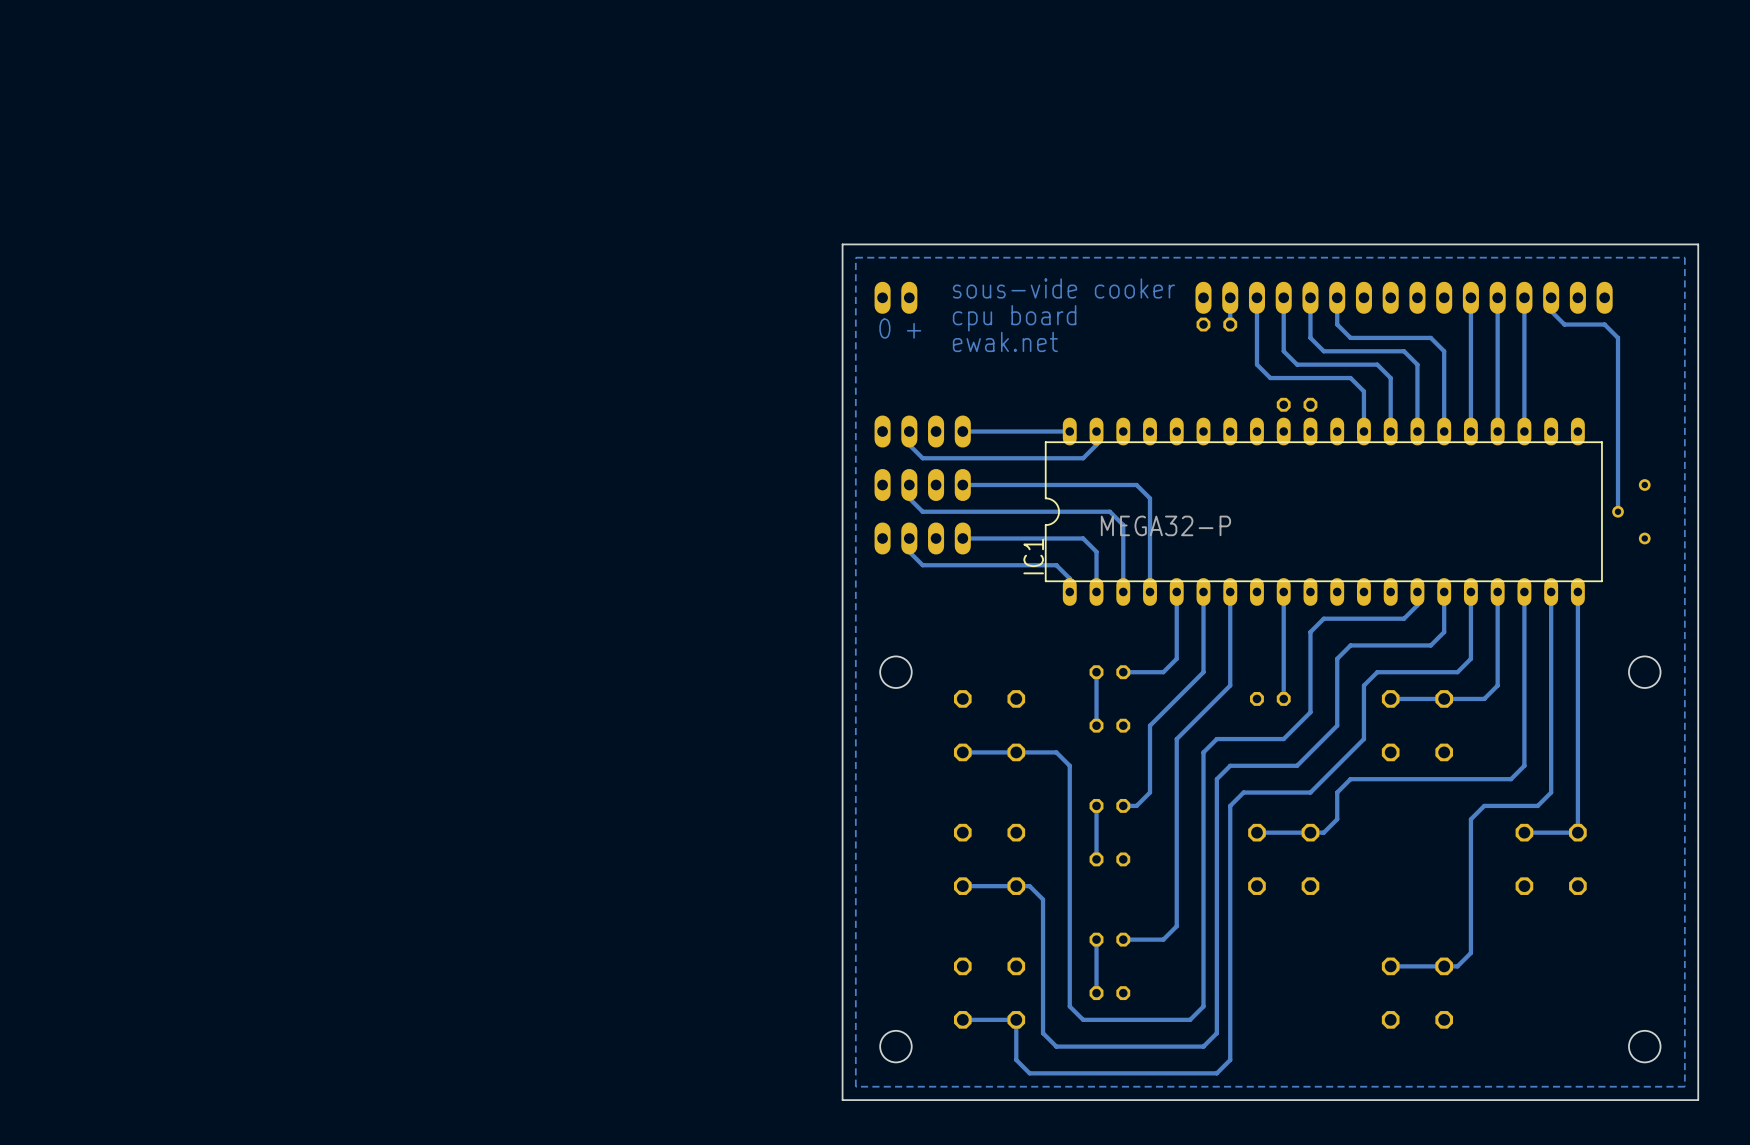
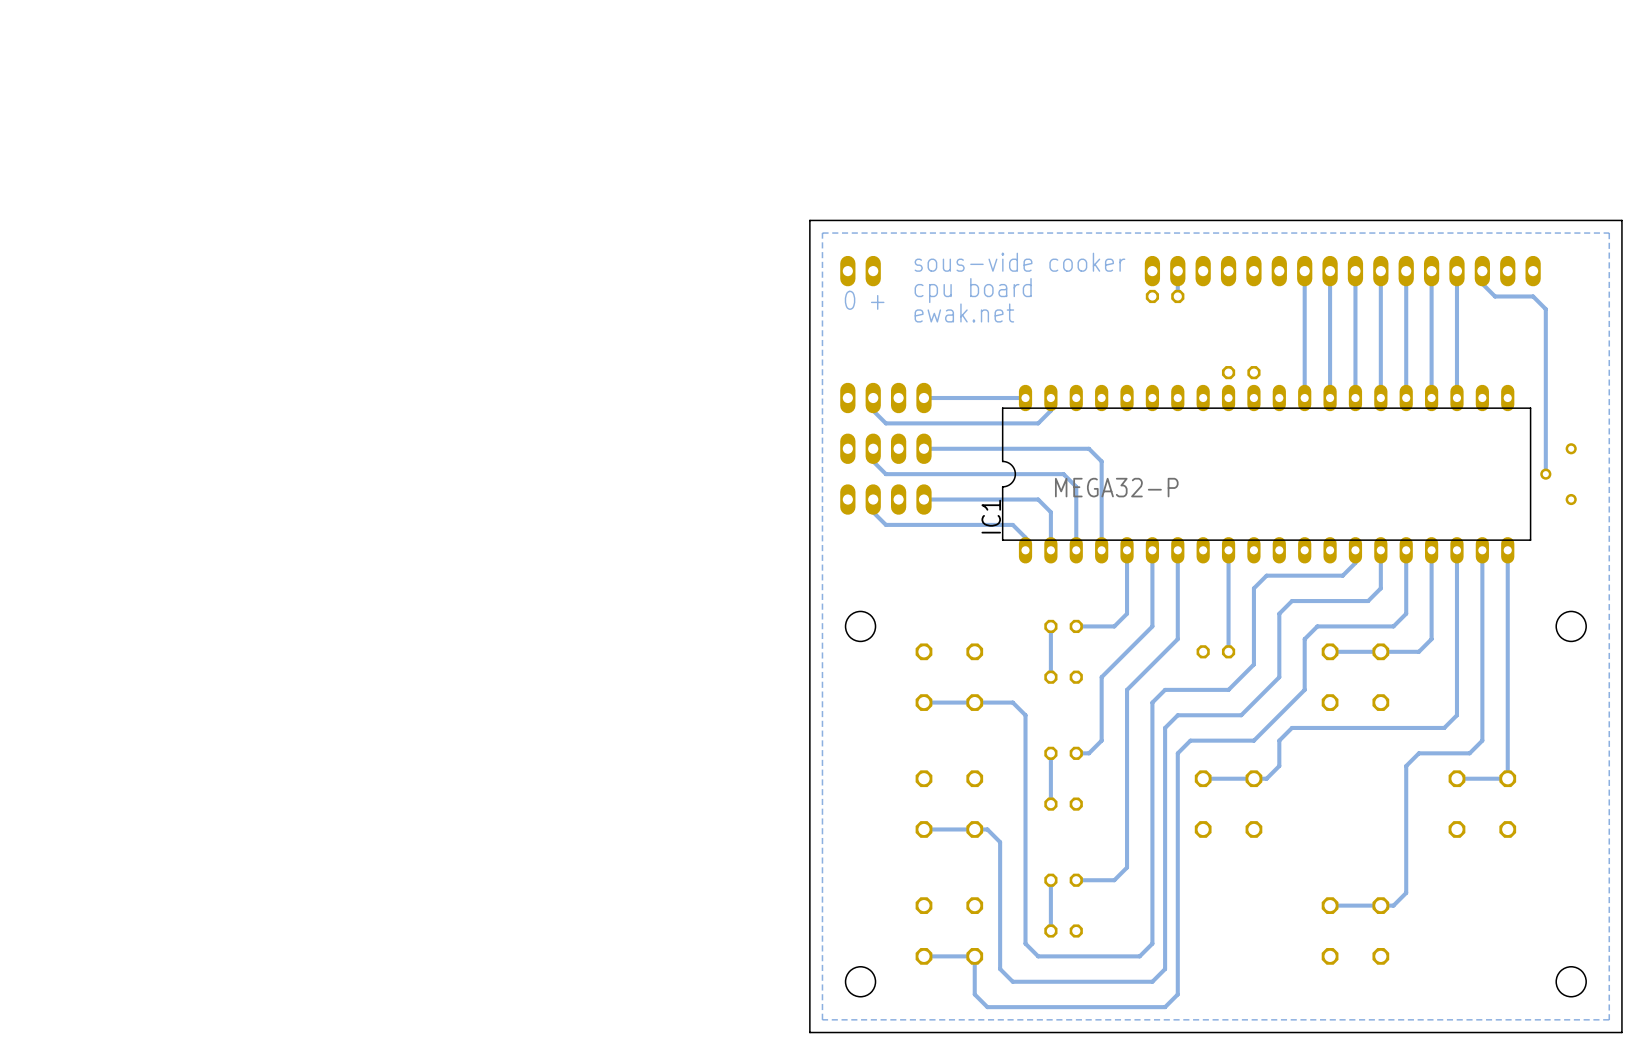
track: (1256, 297) (1256, 364) (1270, 378) (1350, 378) (1363, 391) -> (1304, 271) (1304, 359)
track: (1283, 297) (1283, 351) (1297, 364) (1377, 364) (1390, 378) -> (1330, 271) (1330, 347)
track: (1310, 297) (1310, 337) (1323, 351) (1404, 351) (1417, 364) -> (1355, 271) (1355, 334)
track: (1337, 297) (1337, 324) (1350, 337) (1430, 337) (1444, 351) -> (1380, 271) (1380, 321)

